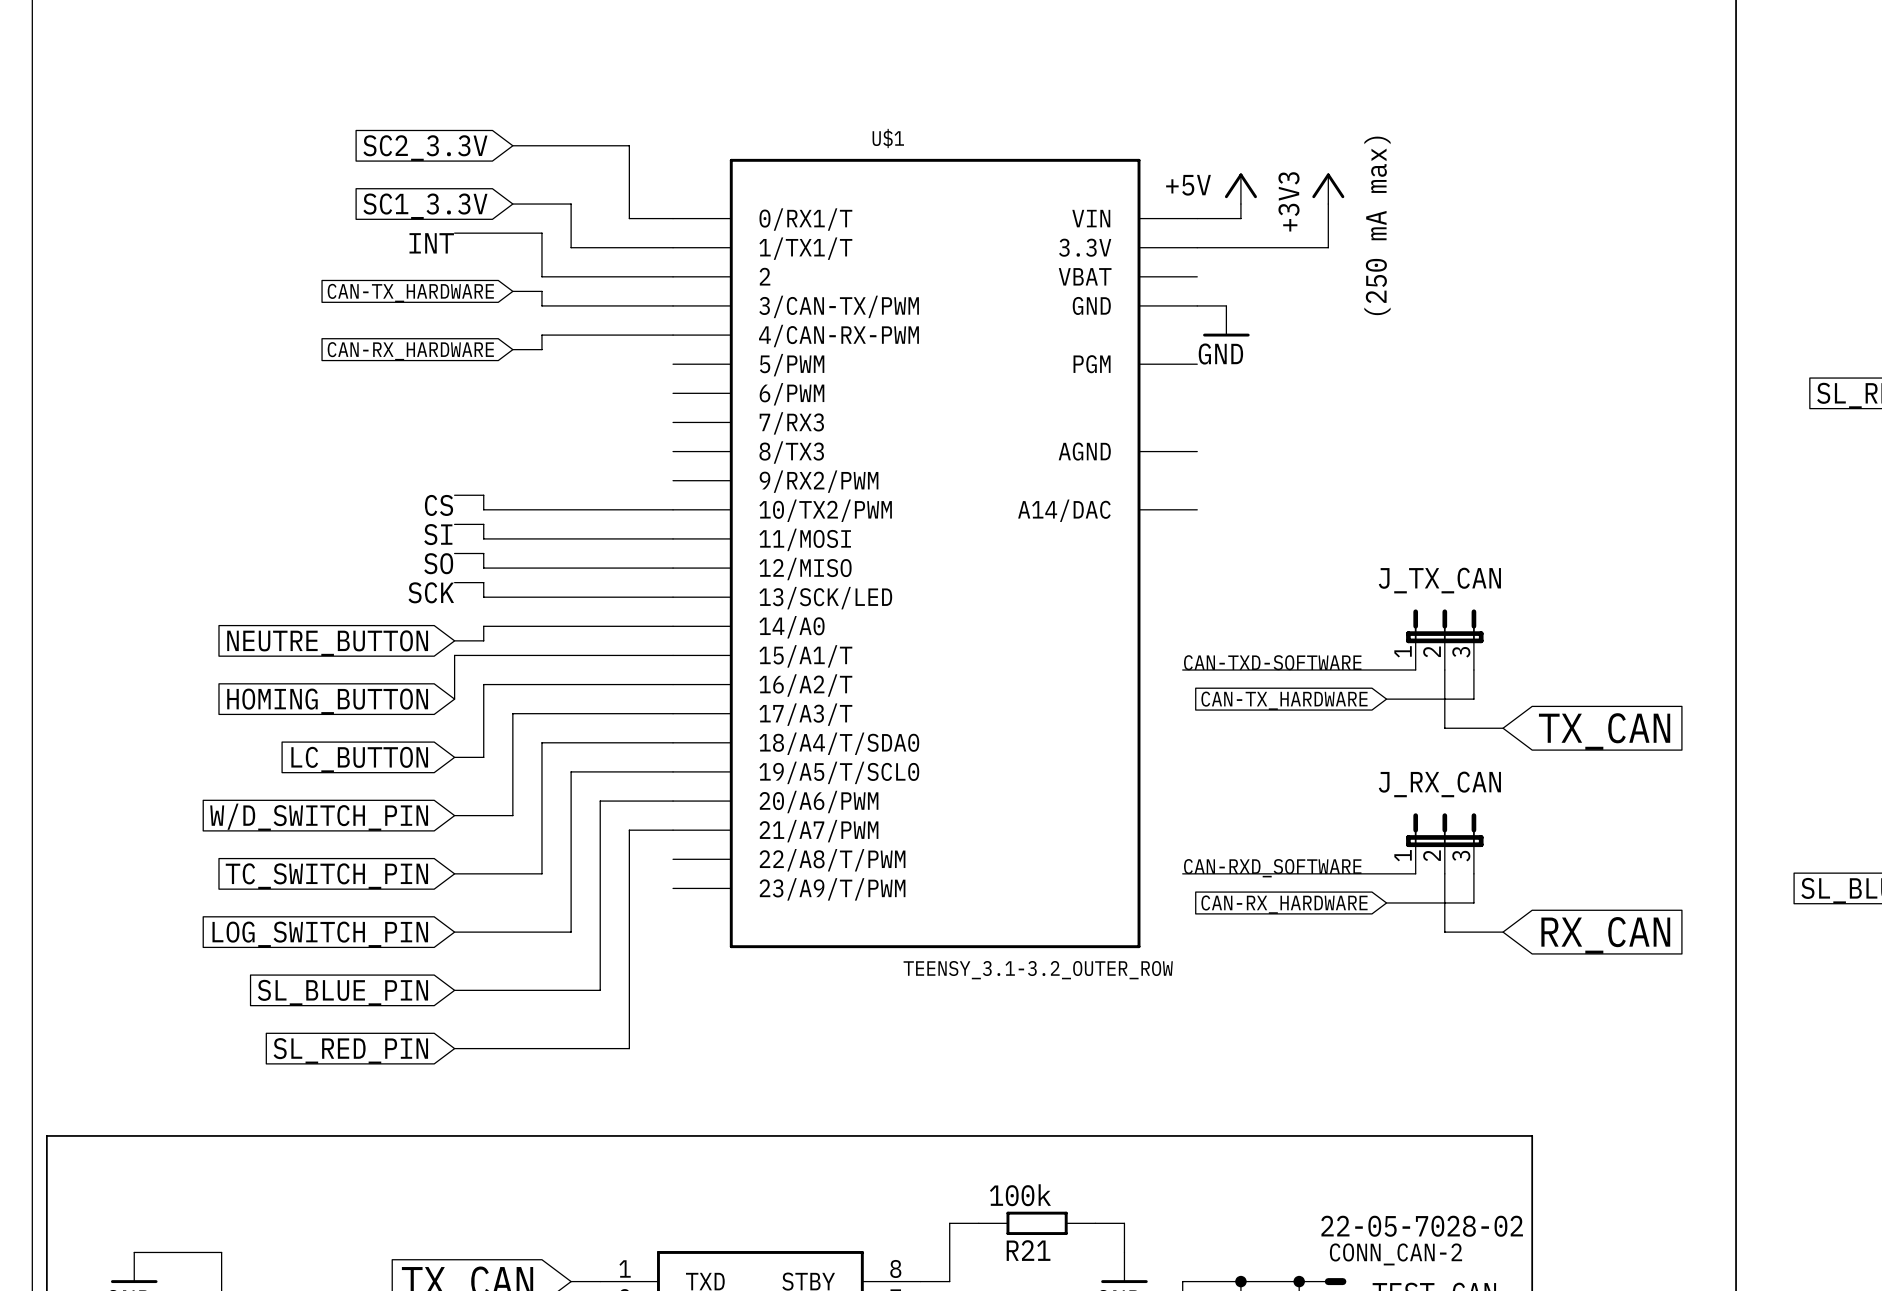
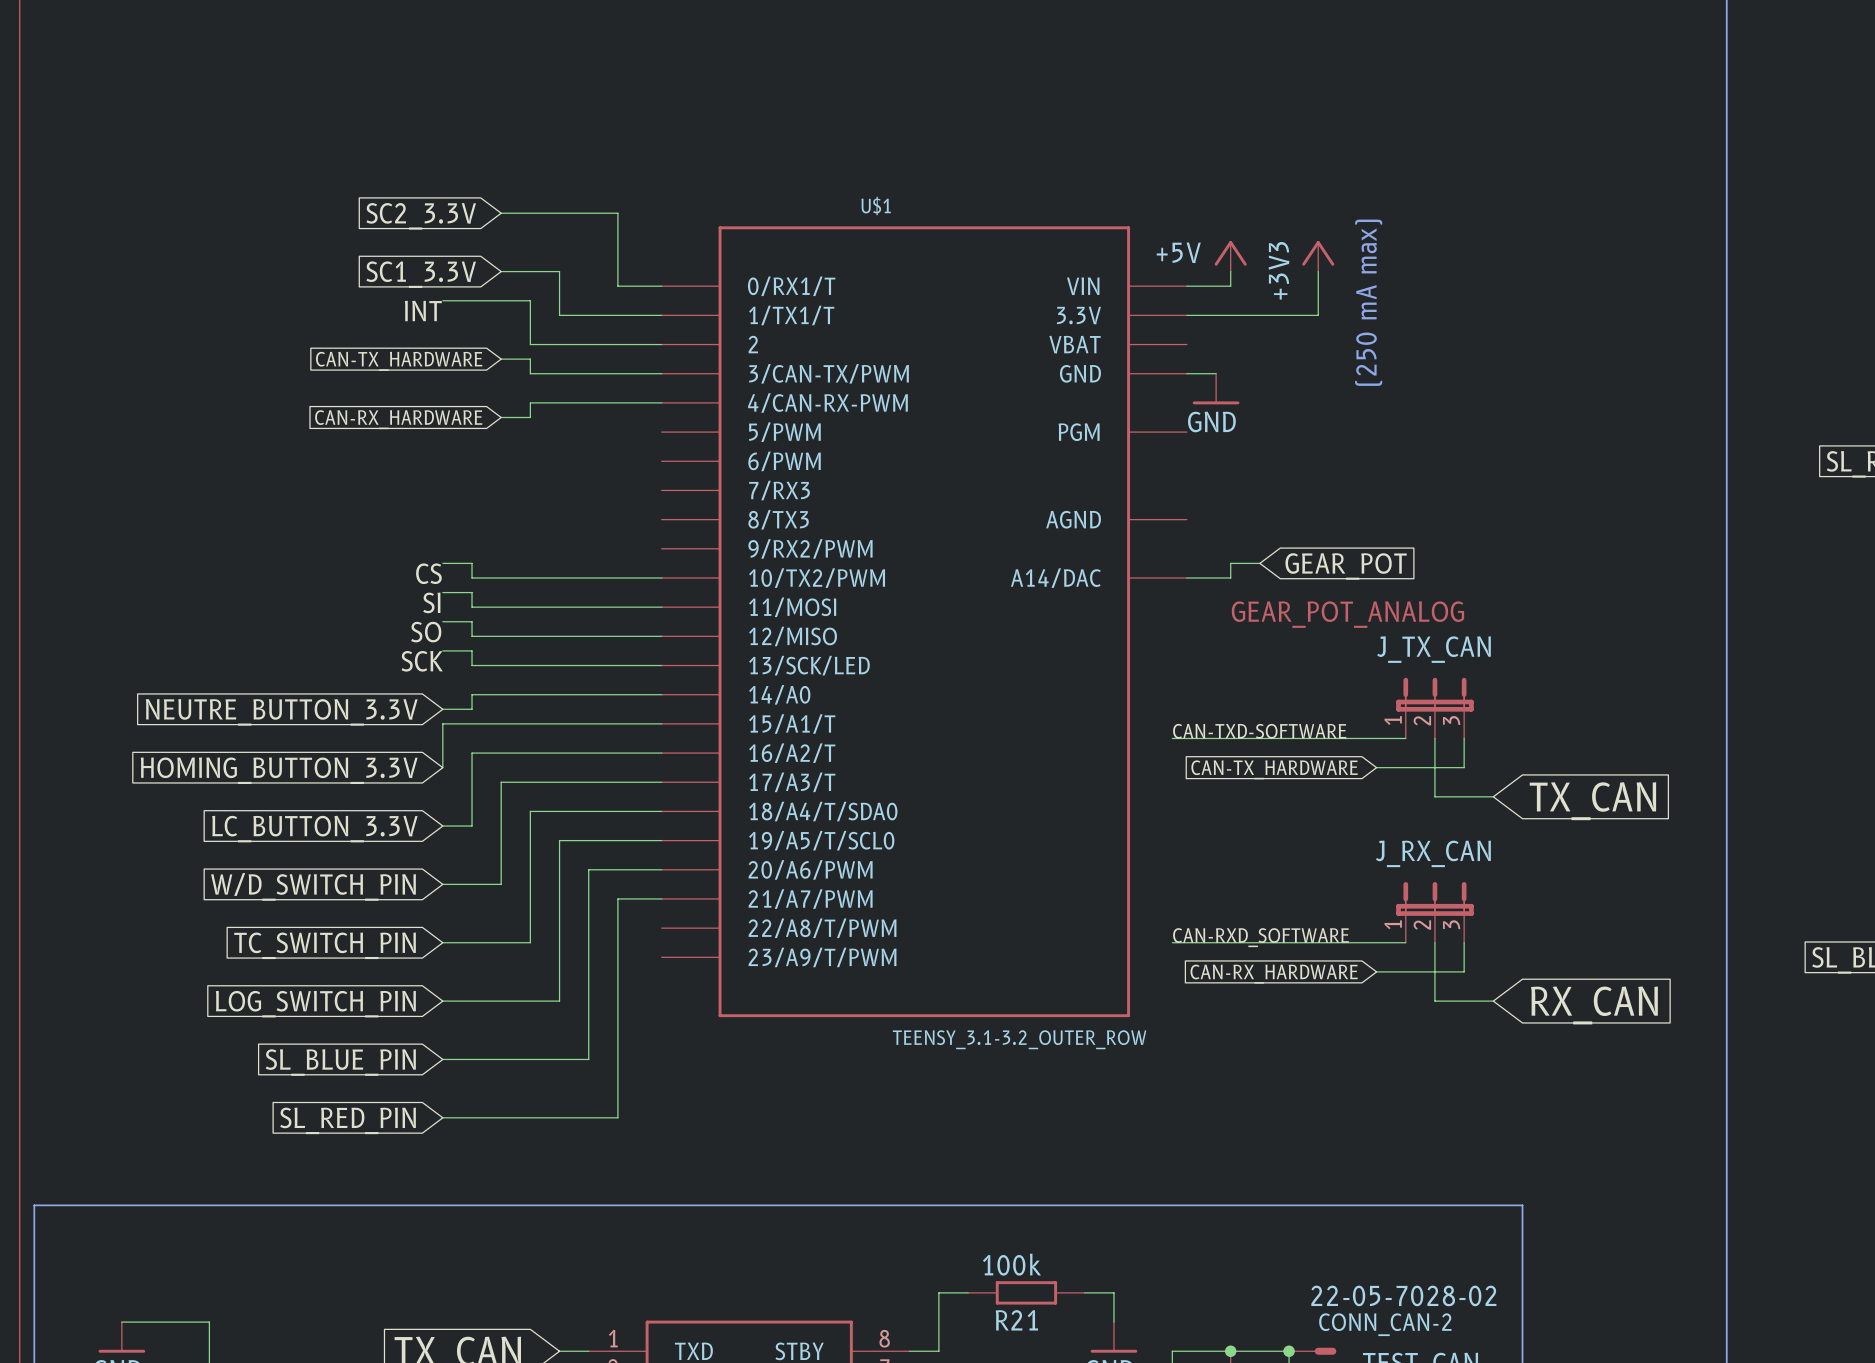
wire: none -> (1259, 563) (1230, 563) (1230, 577) (1186, 577)
global label: none -> GEAR_POT (1346, 566)
text: none -> GEAR_POT_ANALOG (1347, 614)
global label: NEUTRE_BUTTON (327, 643) -> NEUTRE_BUTTON_3.3V (281, 712)
global label: HOMING_BUTTON (327, 701) -> HOMING_BUTTON_3.3V (279, 770)
global label: LC_BUTTON (359, 759) -> LC_BUTTON_3.3V (314, 829)

